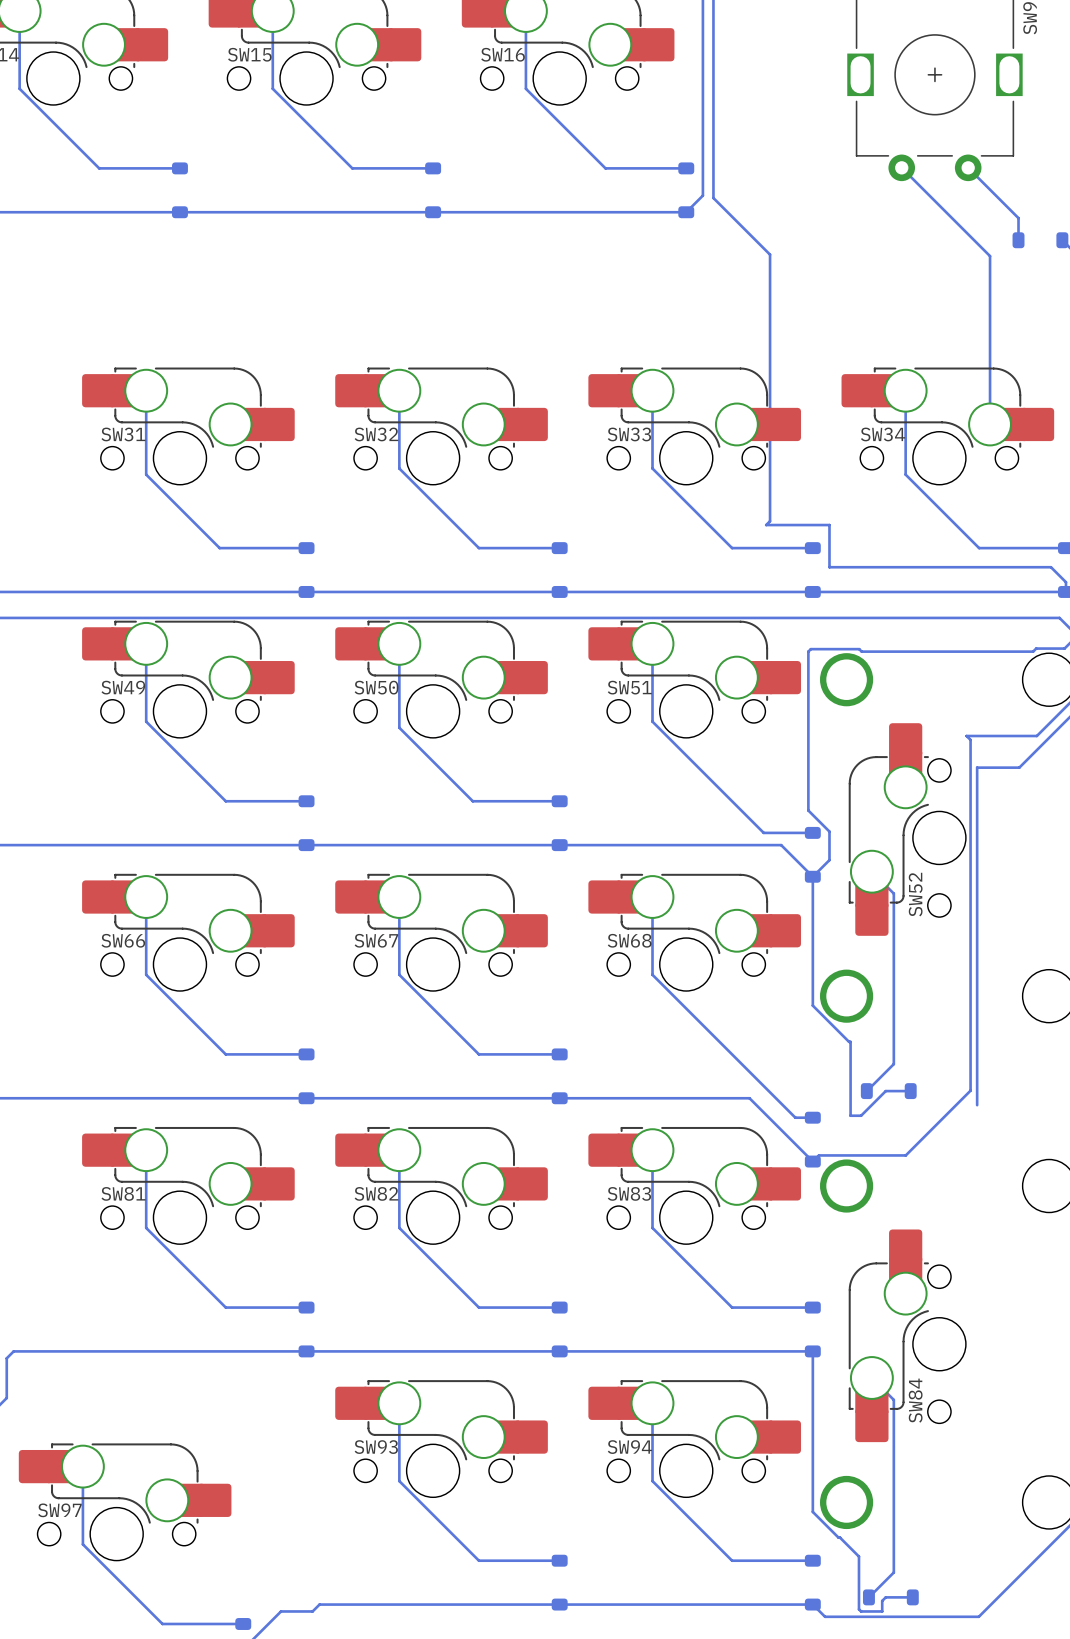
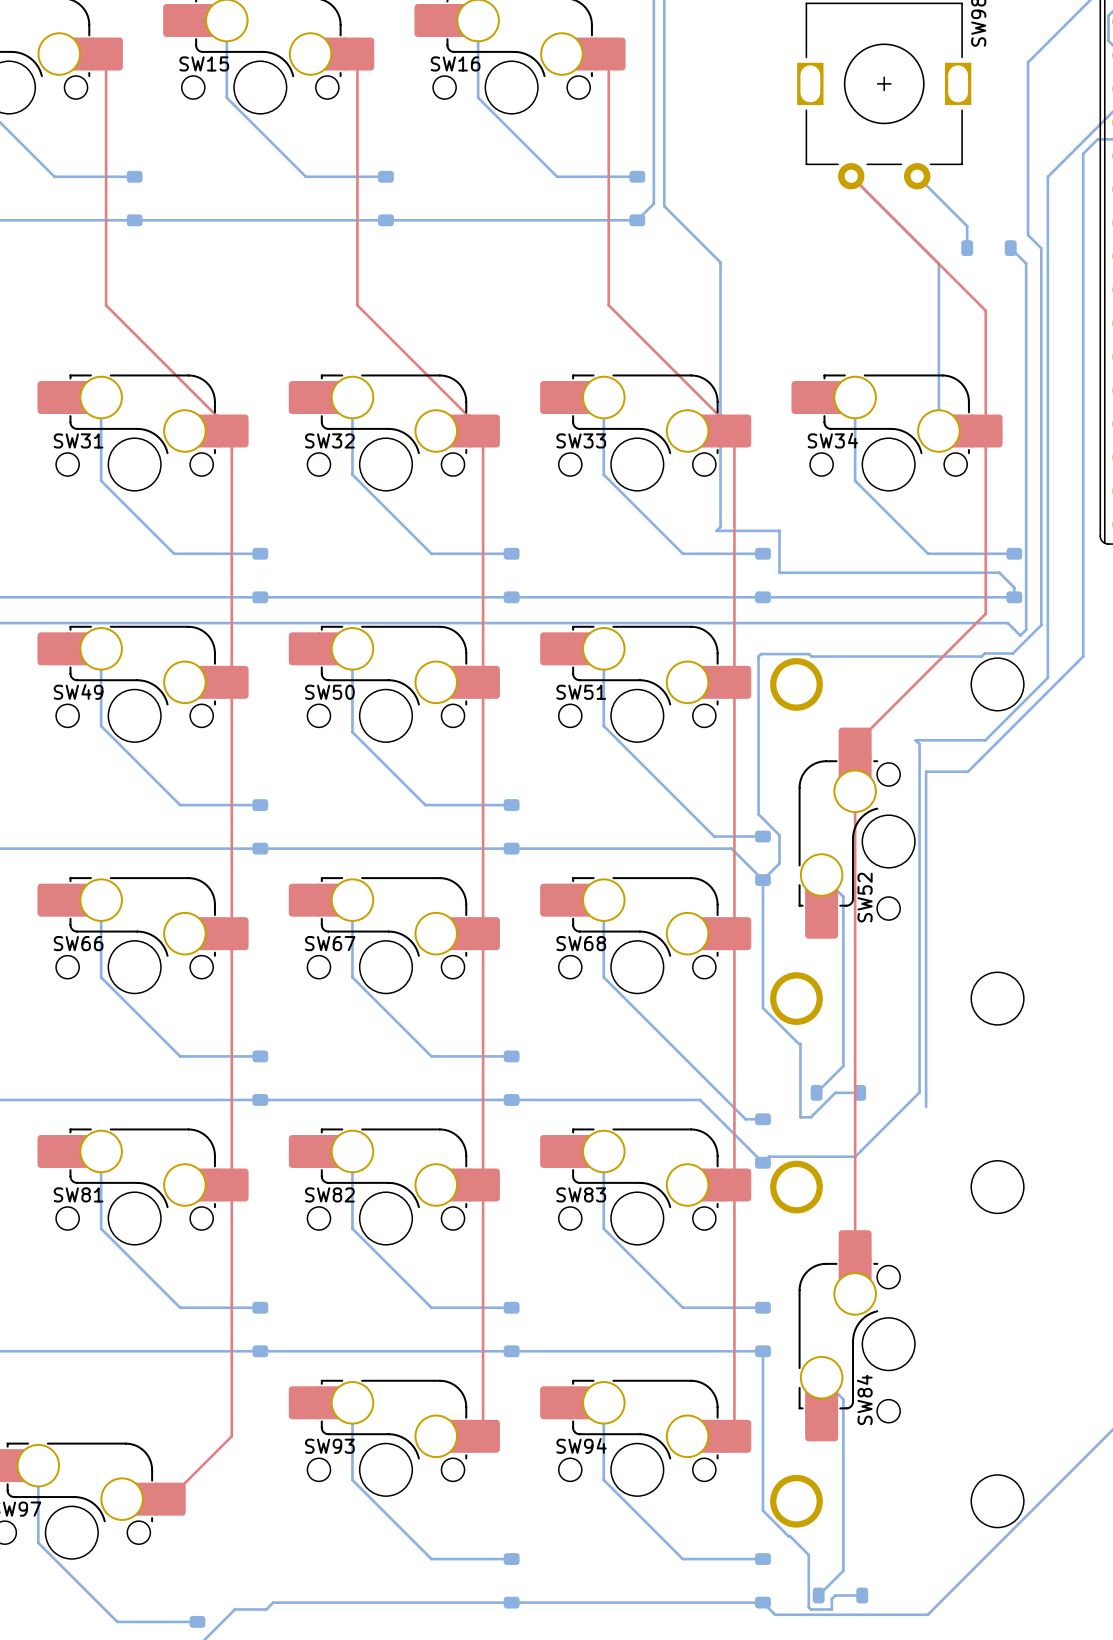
top track: none -> (106, 54) (106, 305) (231, 431) (231, 1436) (168, 1499)
top track: none -> (357, 54) (357, 305) (483, 431) (483, 1436)
top track: none -> (608, 54) (608, 305) (734, 431) (734, 1436)
top track: none -> (851, 176) (985, 310) (985, 613) (855, 744) (855, 1247)

